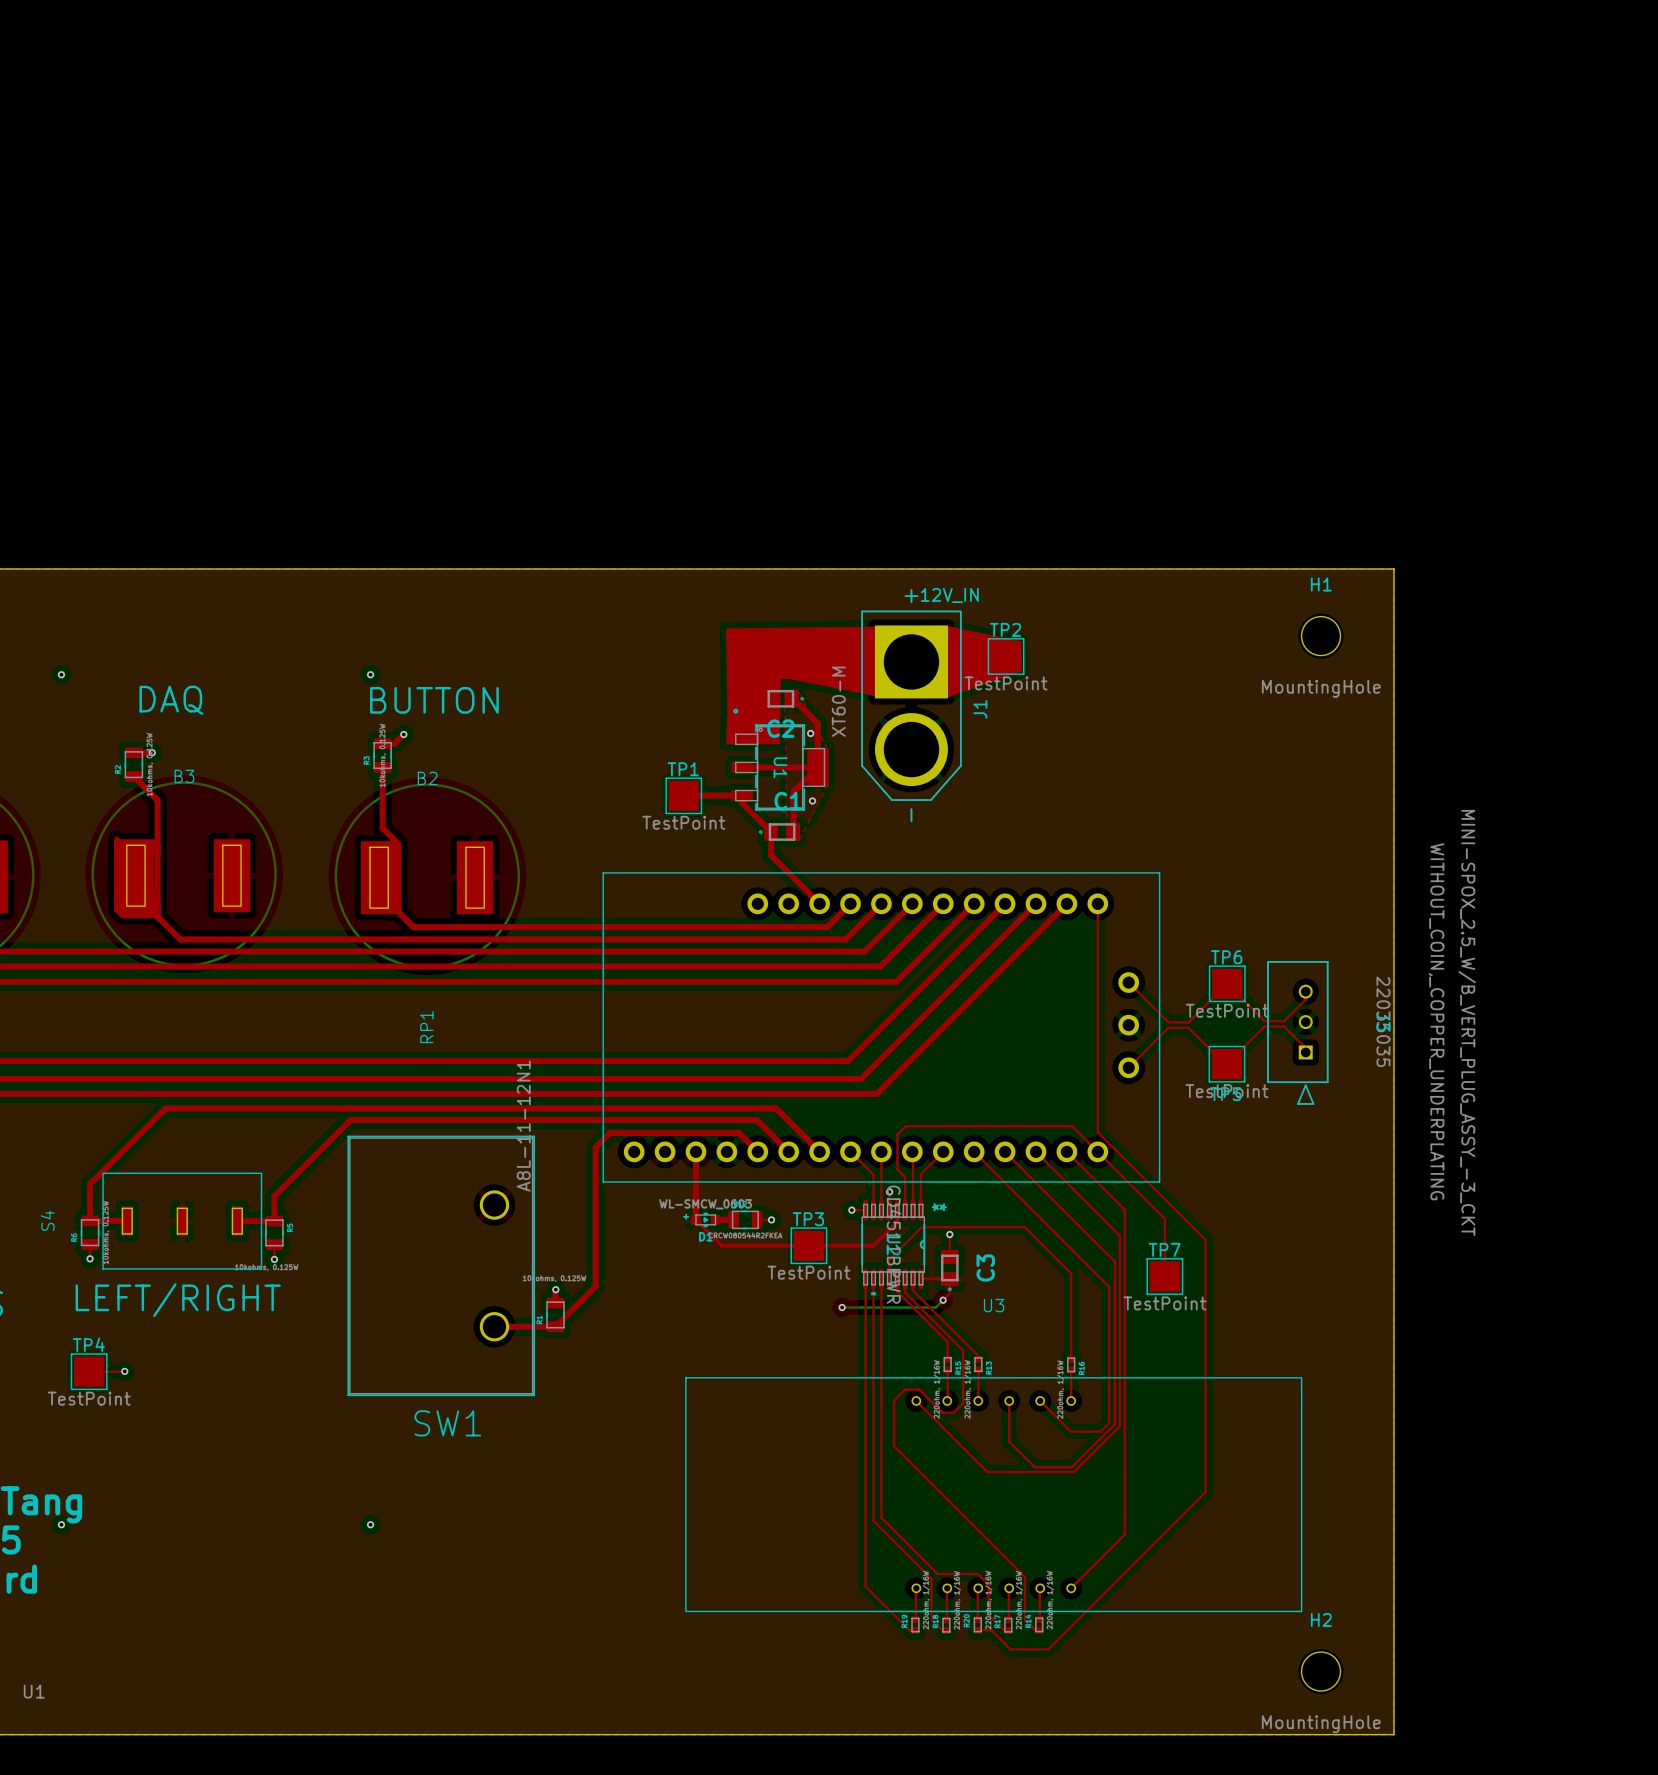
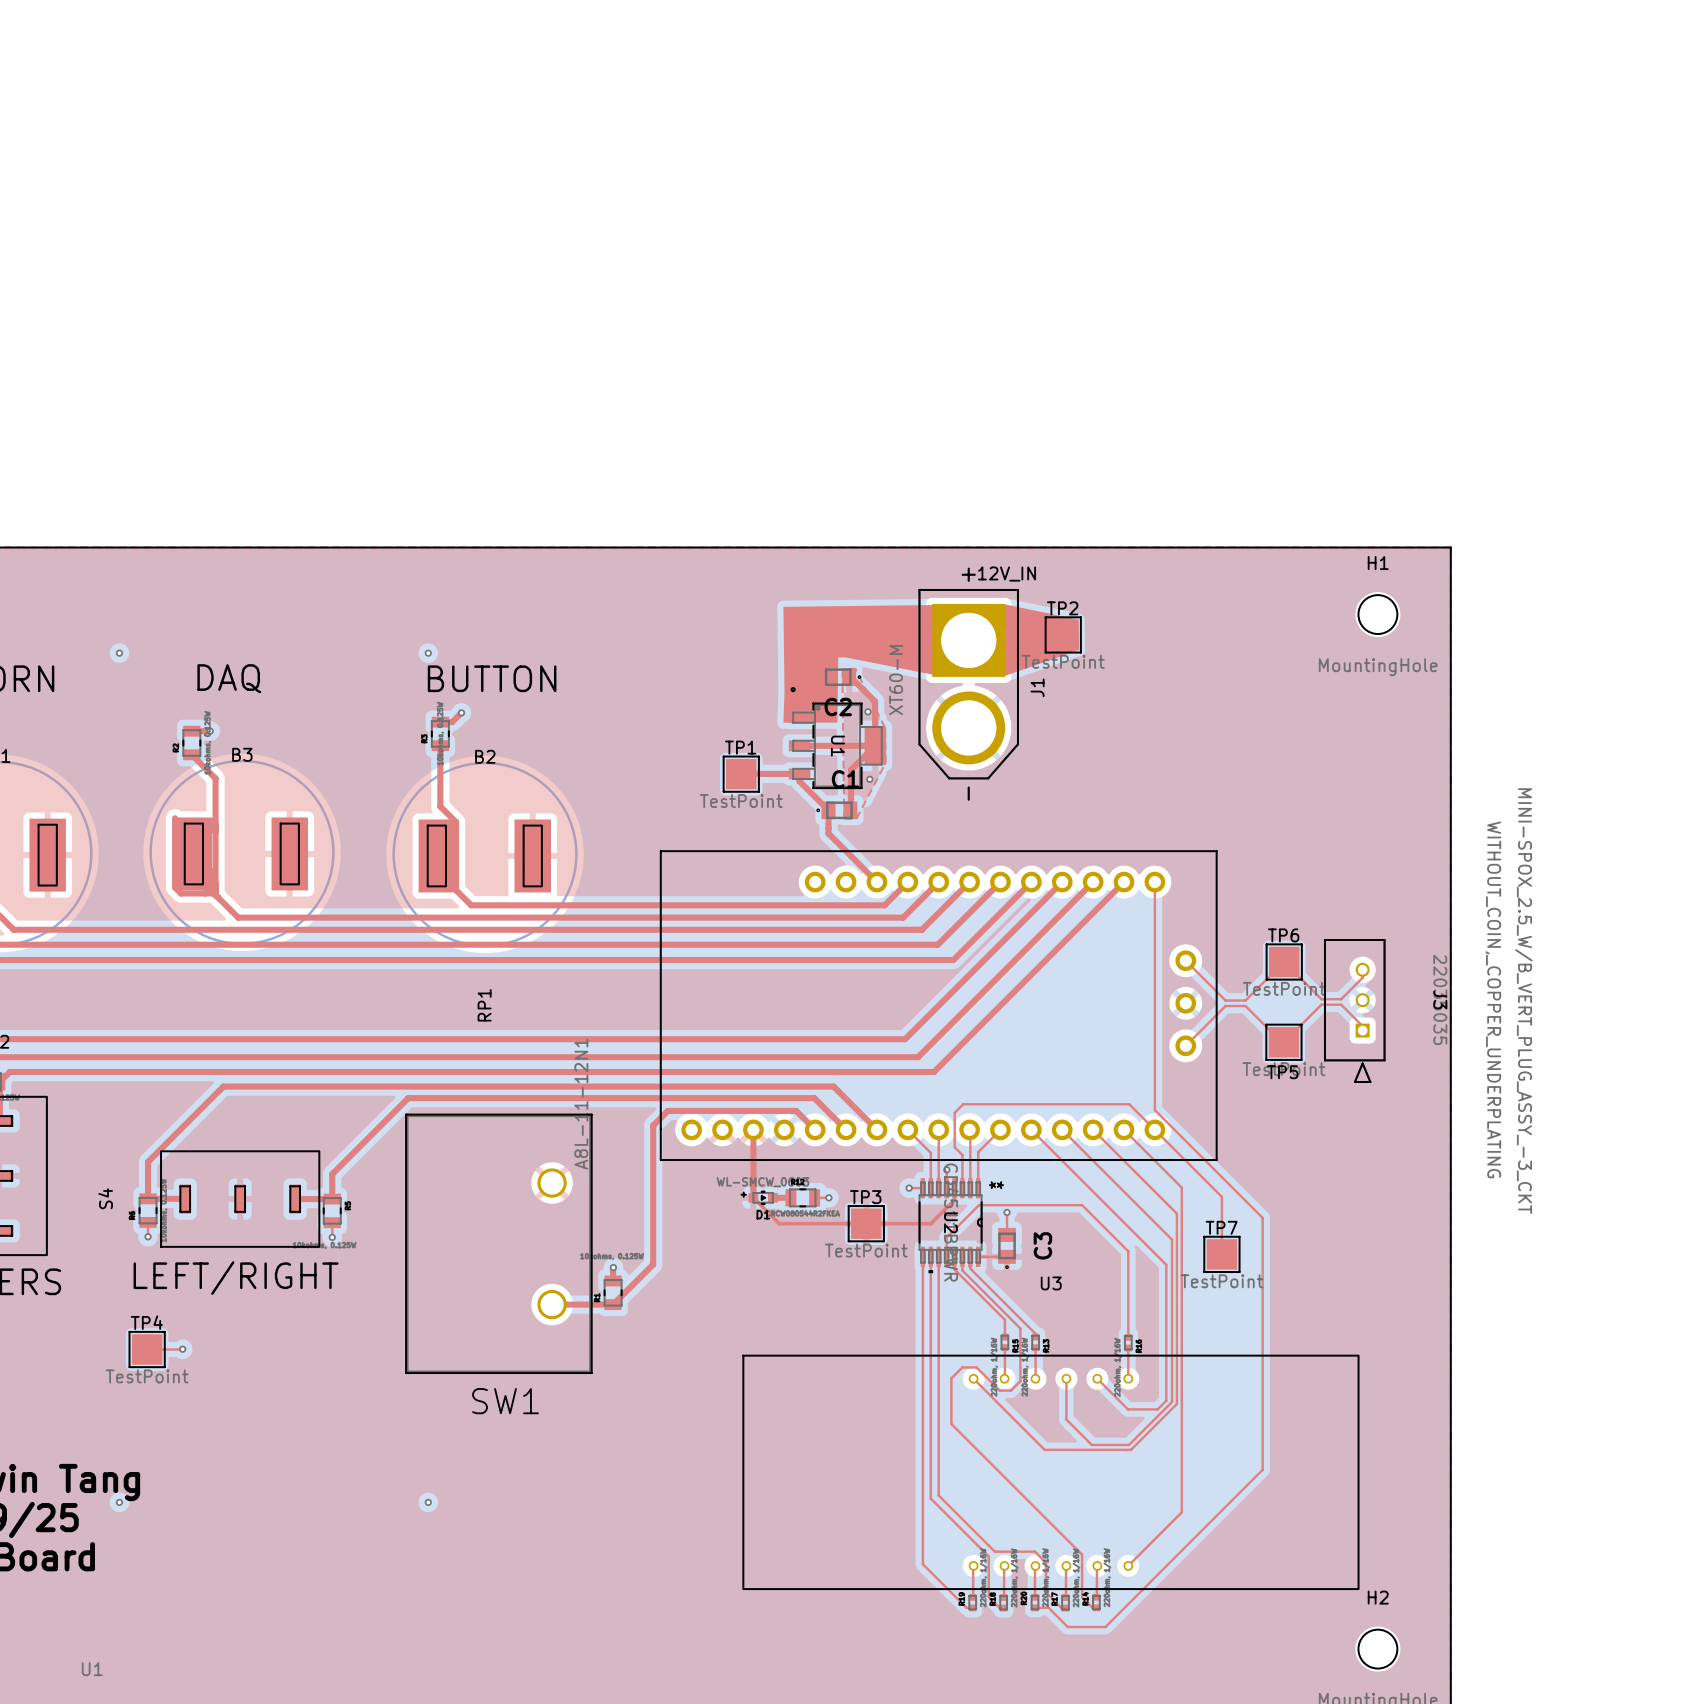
top track: (949, 1278) (949, 1293) (943, 1300) -> none
bottom track: (943, 1300) (935, 1307) (842, 1307) -> none
via: (943, 1300) -> none
via: (842, 1307) -> none

